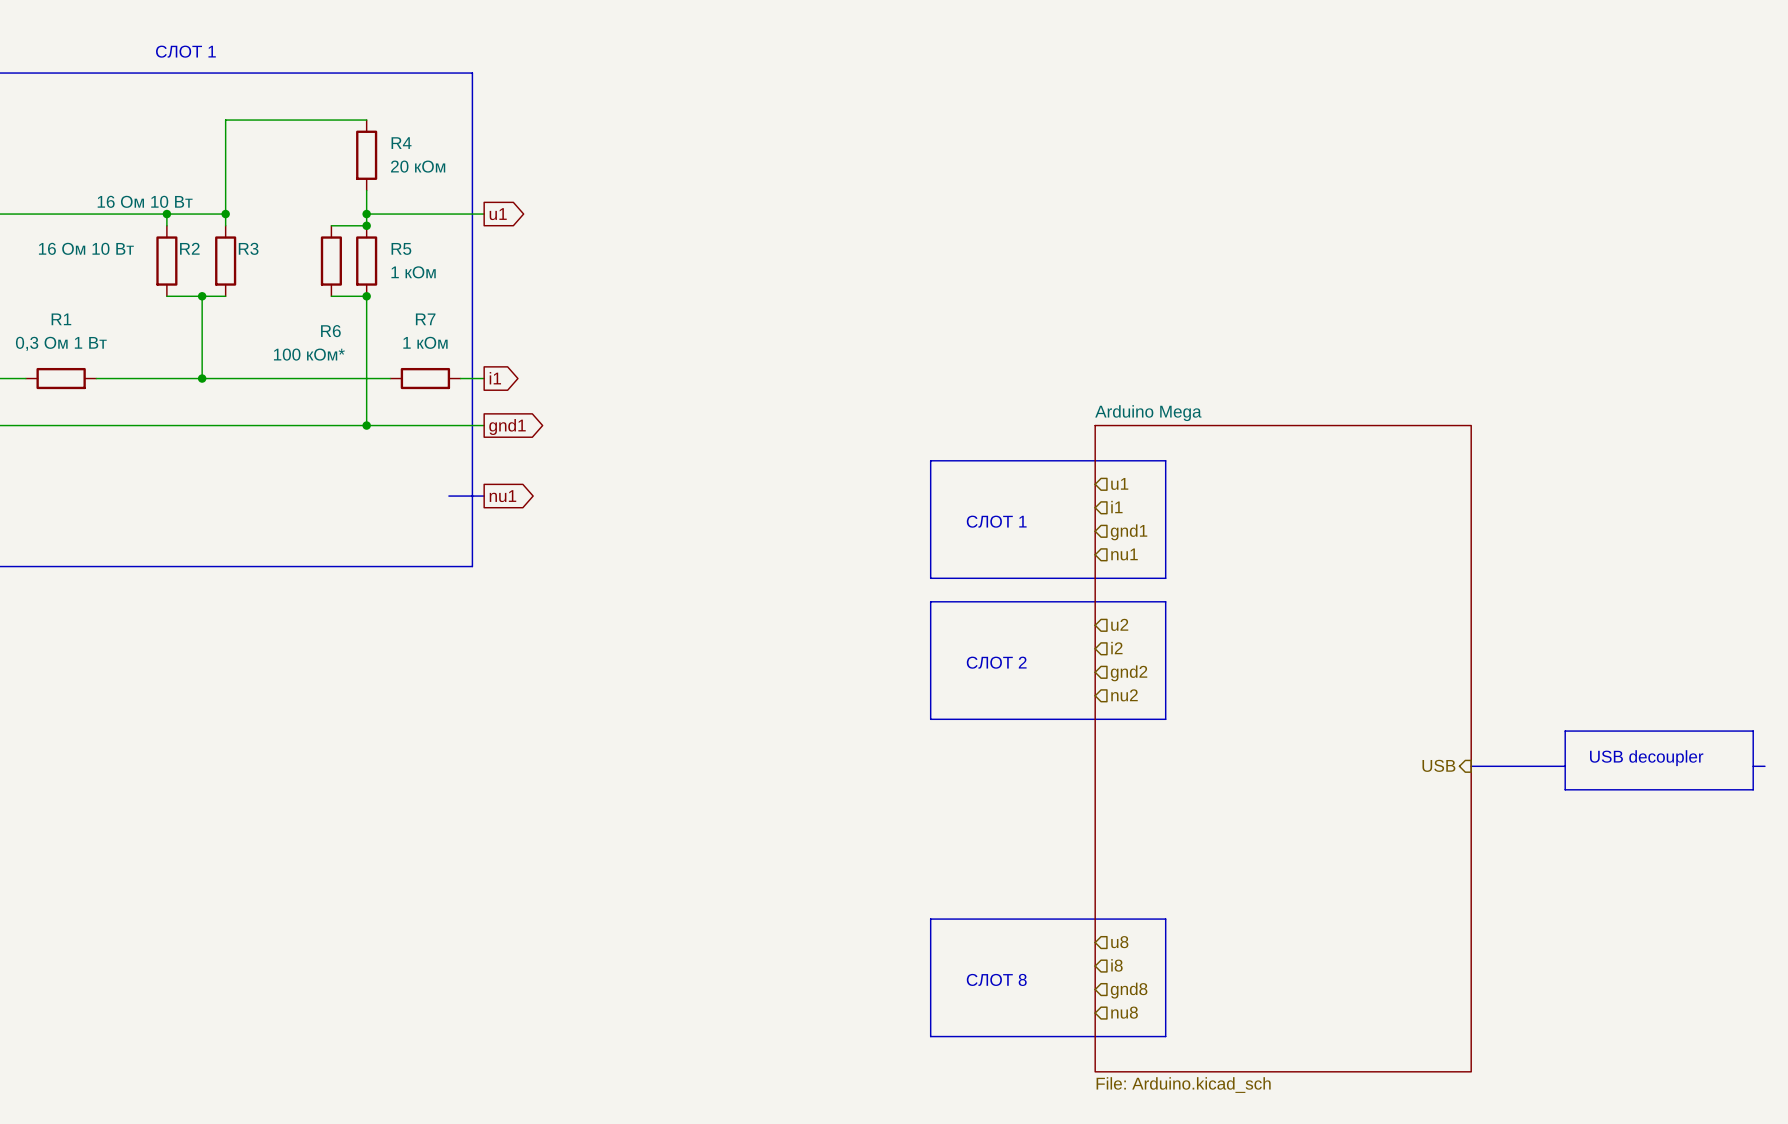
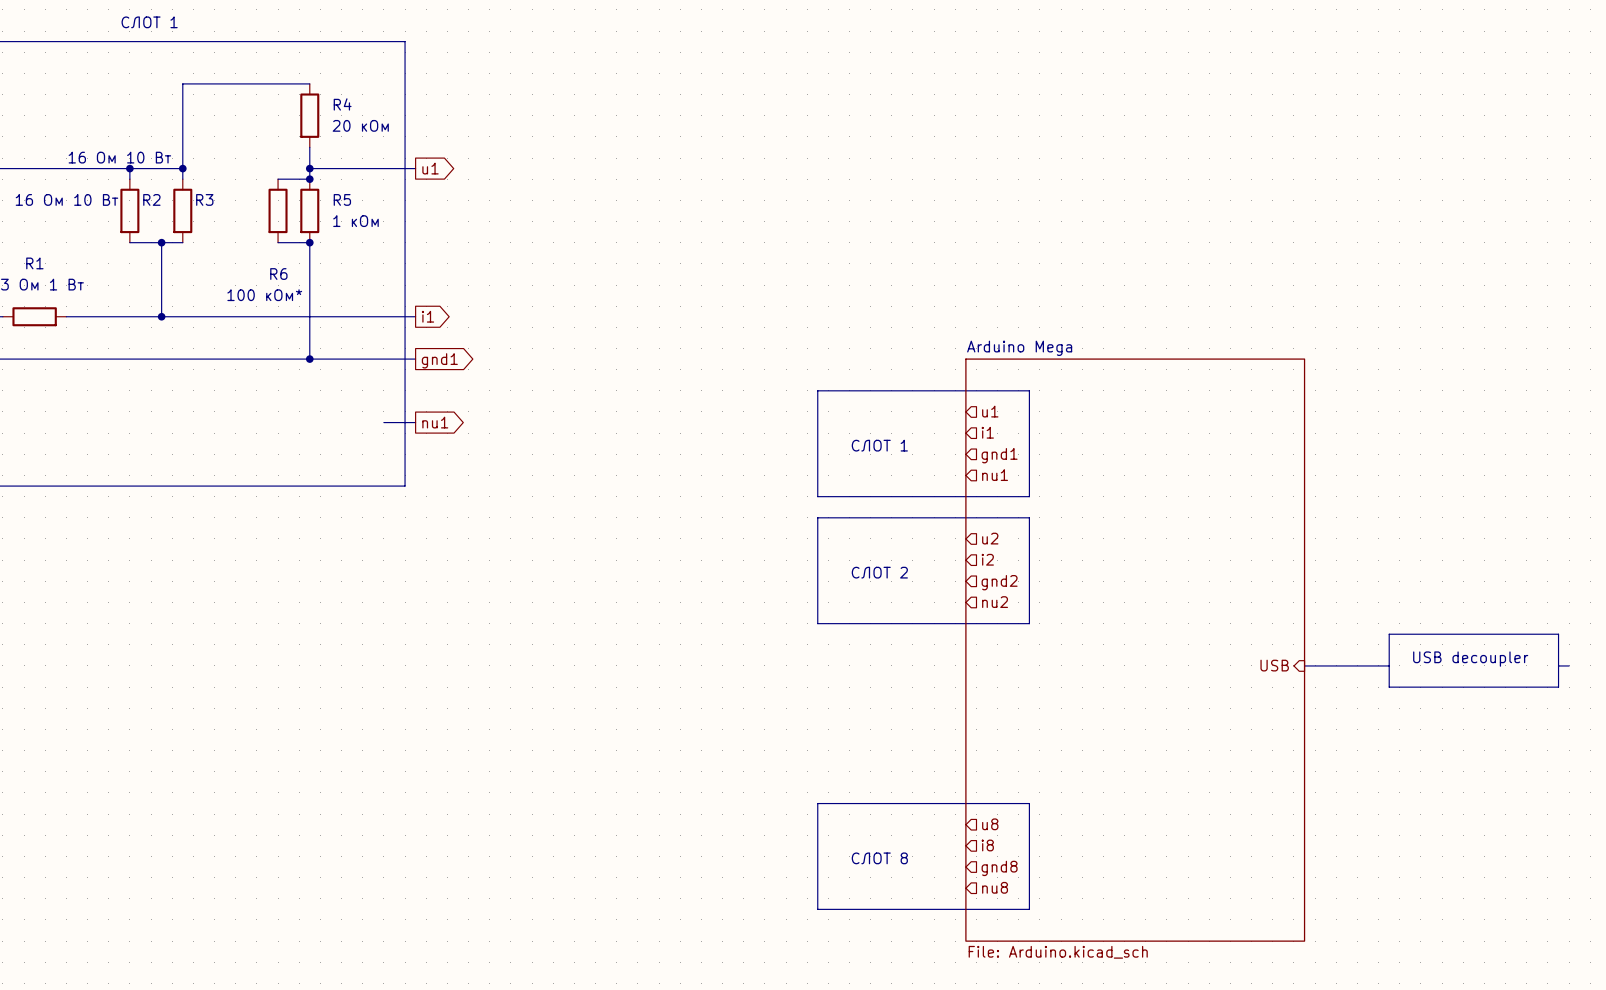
wire: none -> (330, 316) (394, 316)
R7: 1 кОм (425, 378) -> none

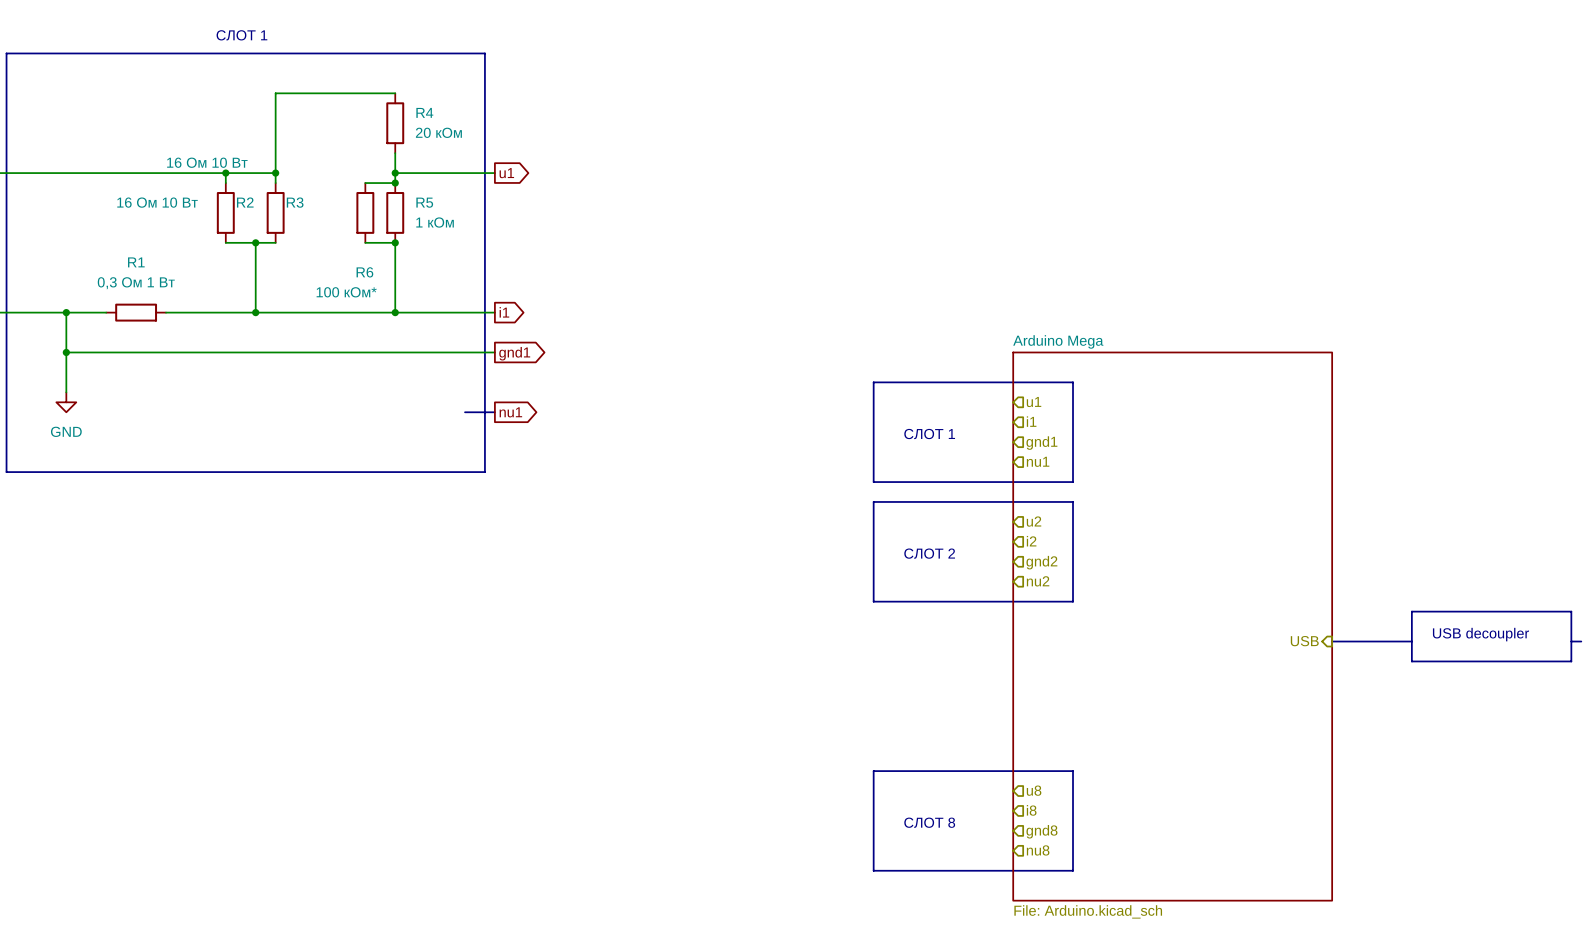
wire: (309, 316) (309, 359) -> none
junction position: (309, 359) -> (395, 312)

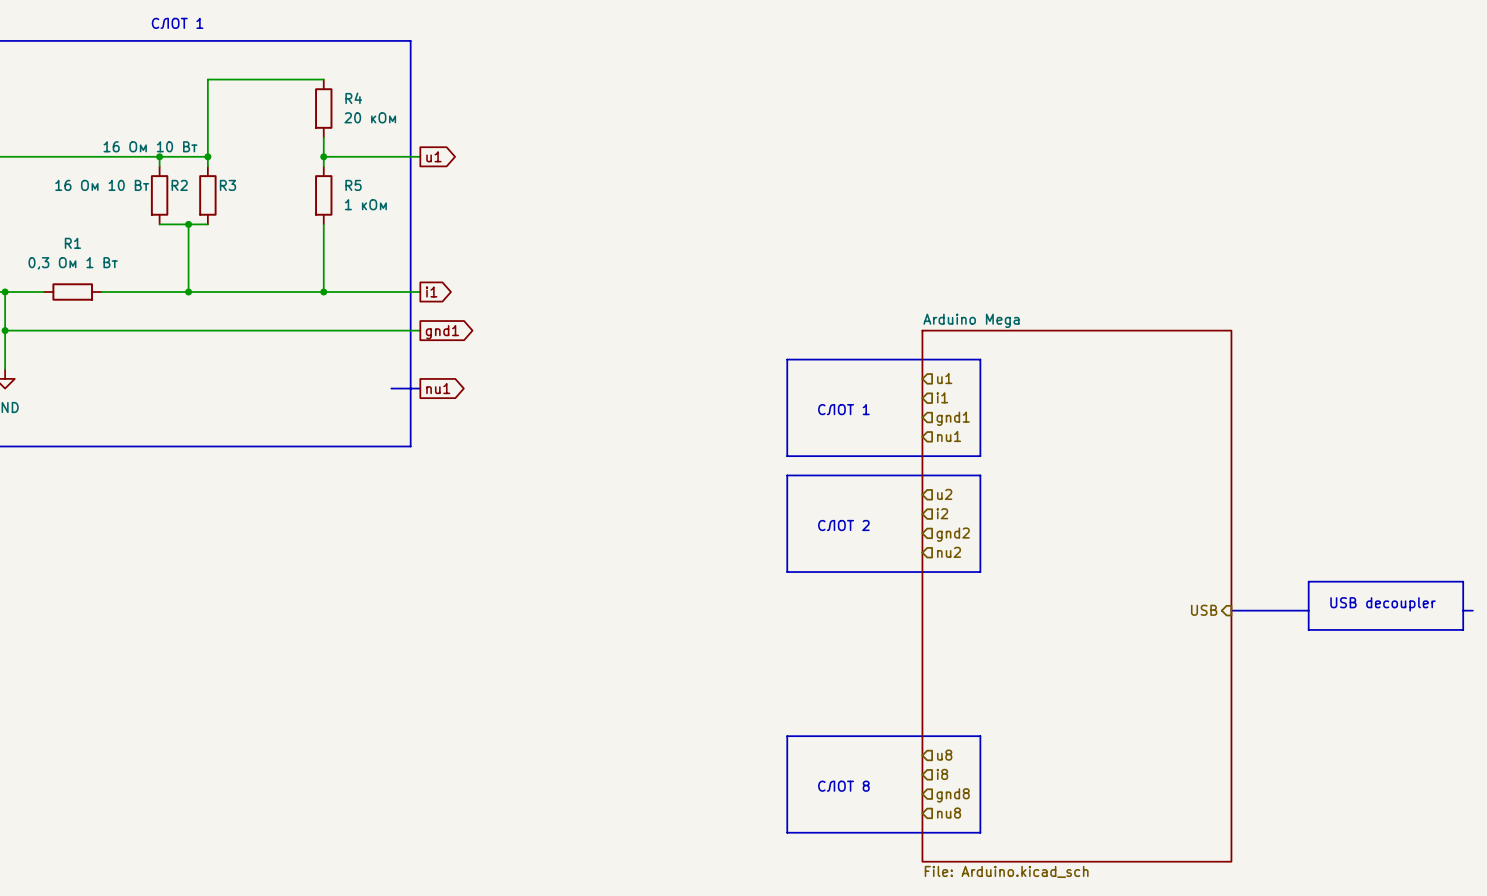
wire: (365, 183) (395, 183) -> none
junction: (395, 183) -> none
R6: 100 кОм* (365, 212) -> none
wire: (365, 242) (395, 242) -> none
junction: (395, 242) -> none

